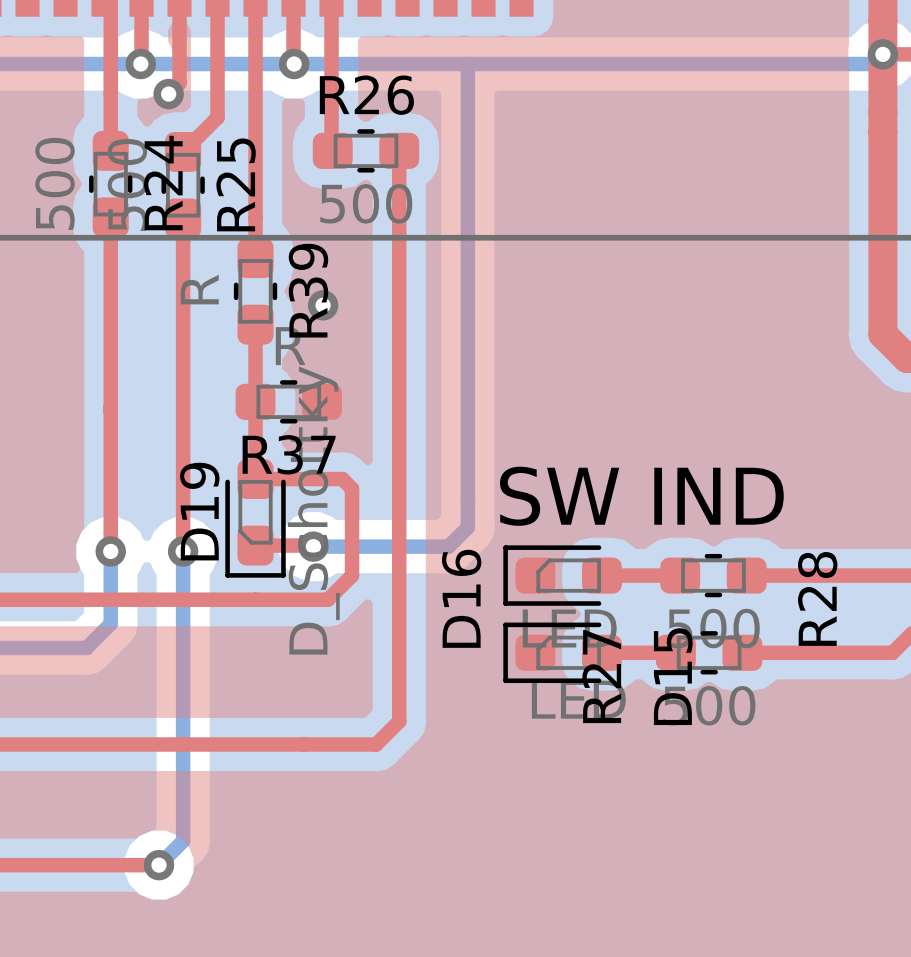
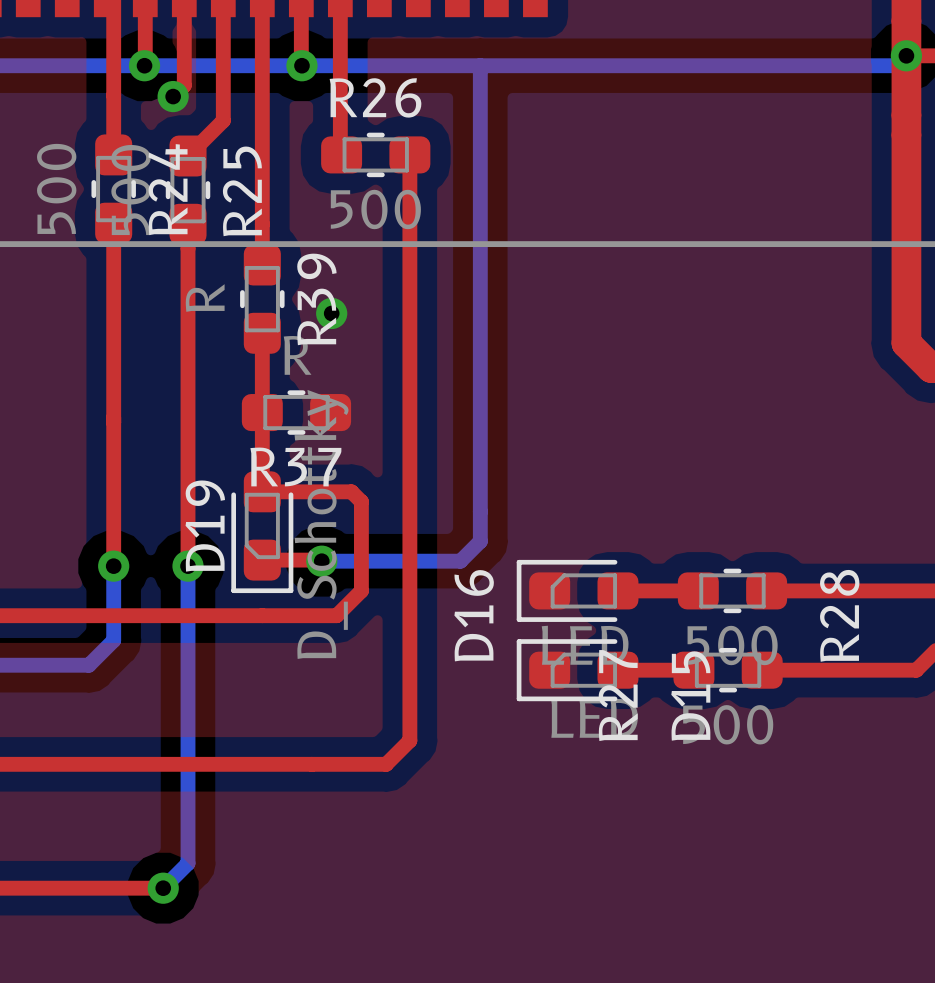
text: SW IND (641, 496) -> none

